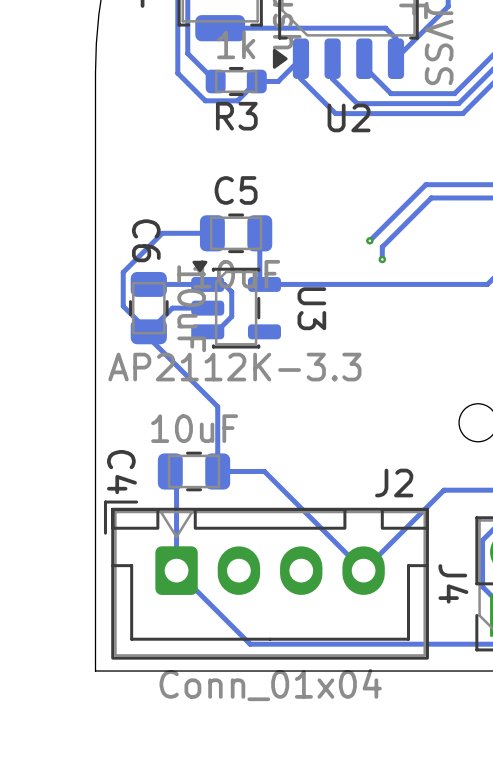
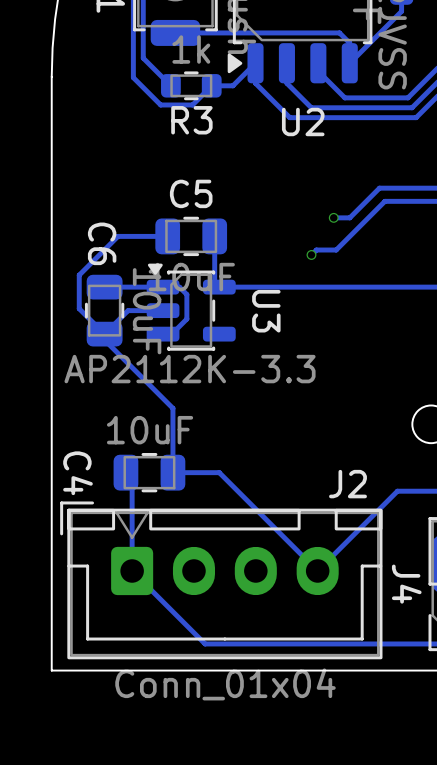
via: none -> (333, 217)
track: (396, 214) (369, 240) -> (349, 217) (333, 217)
via: (369, 240) -> none
track: (382, 247) (382, 259) -> (336, 250) (316, 250) (311, 254)
via: none -> (311, 254)
via: (382, 259) -> none

